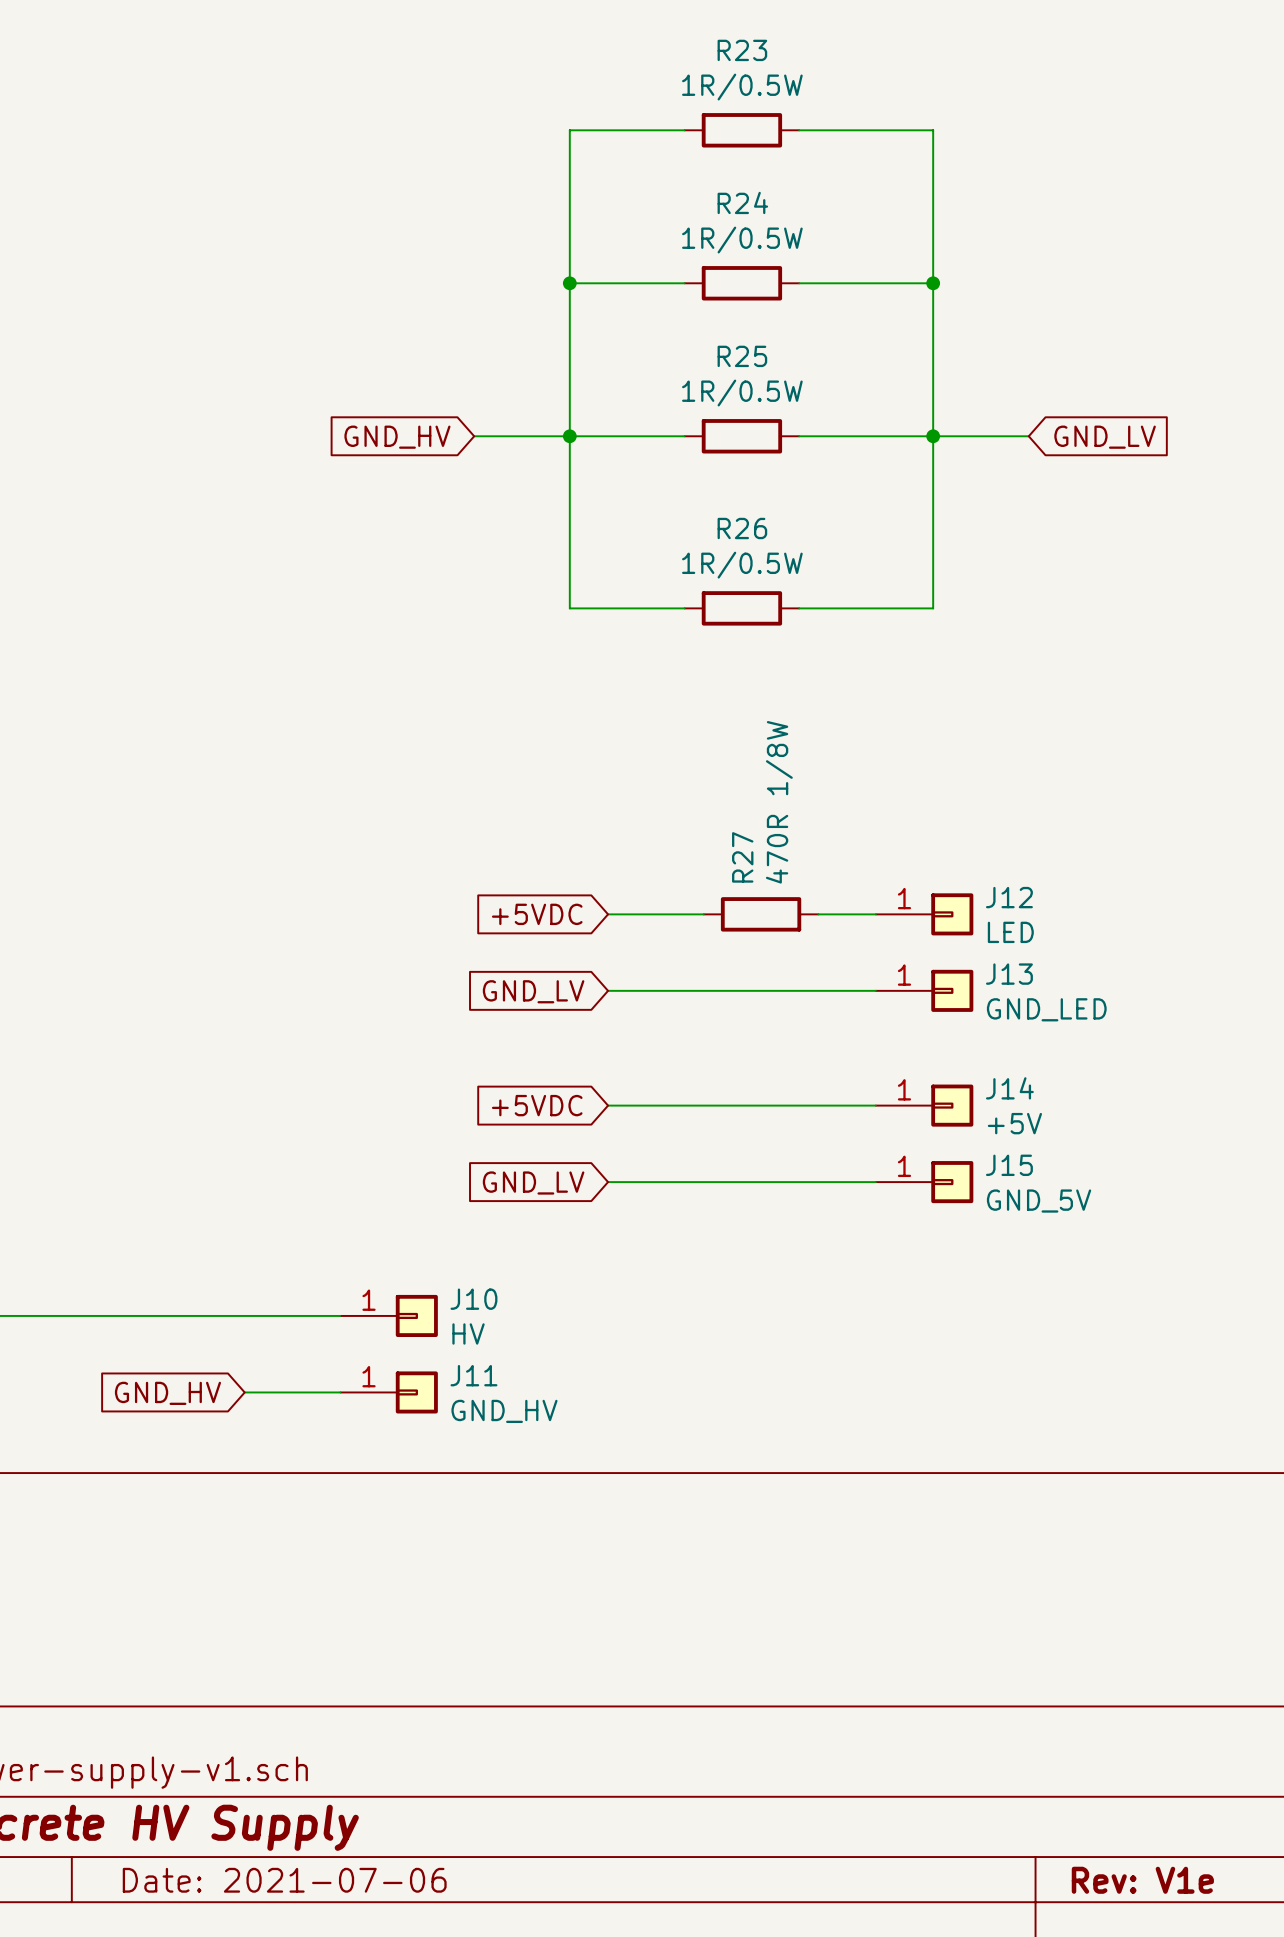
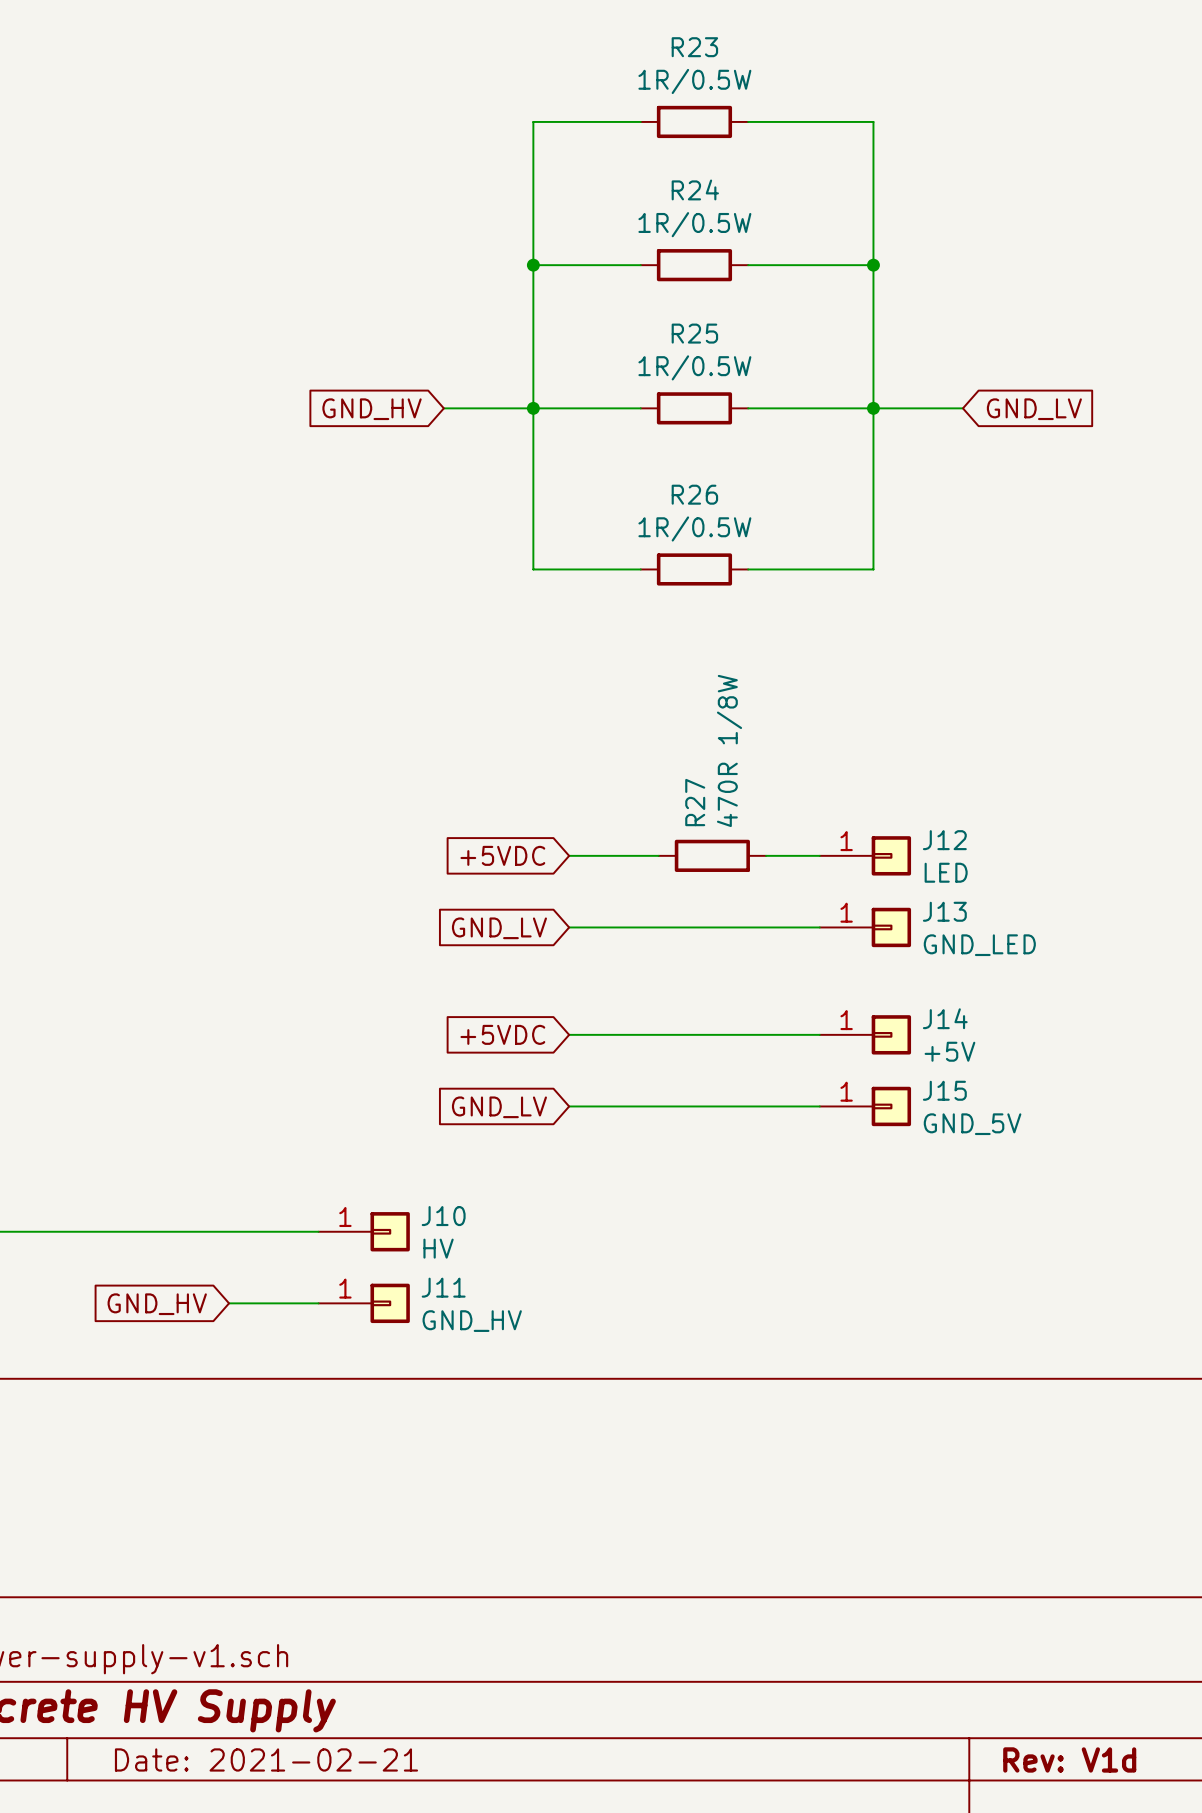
title block: Date: 2021-07-06 (284, 1880) -> Date: 2021-02-21 (266, 1759)
title block: Rev: V1e (1142, 1880) -> Rev: V1d (1069, 1759)

